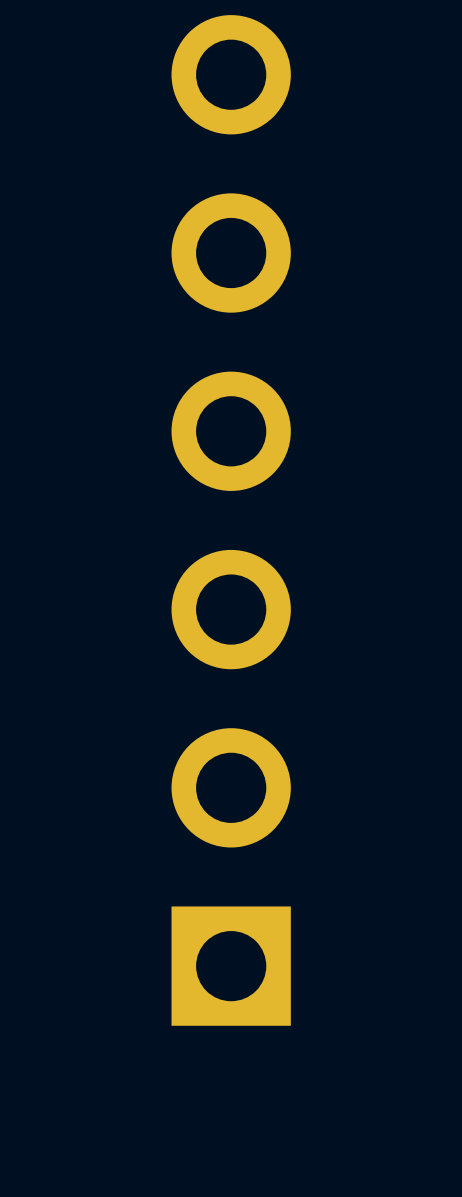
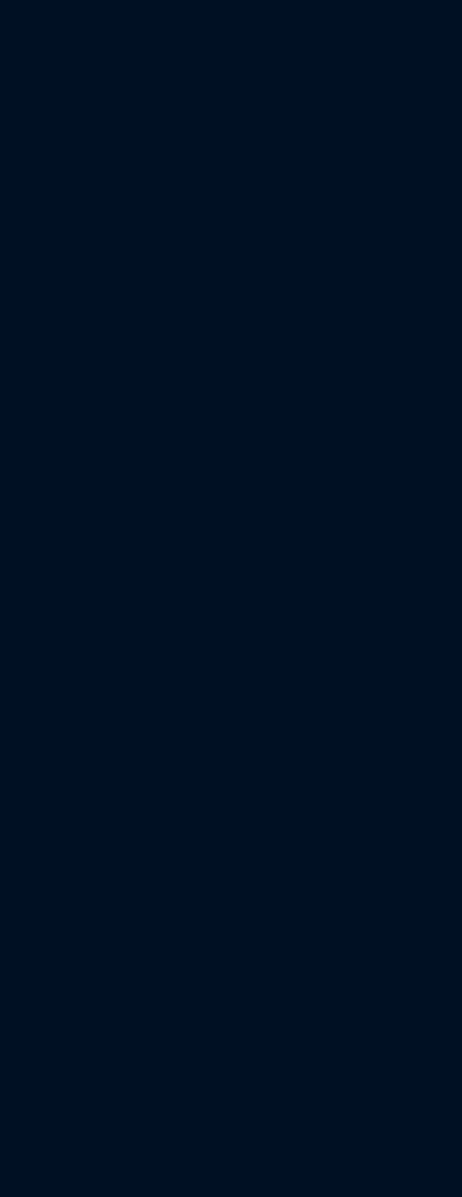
part: (231, 520) -> none

